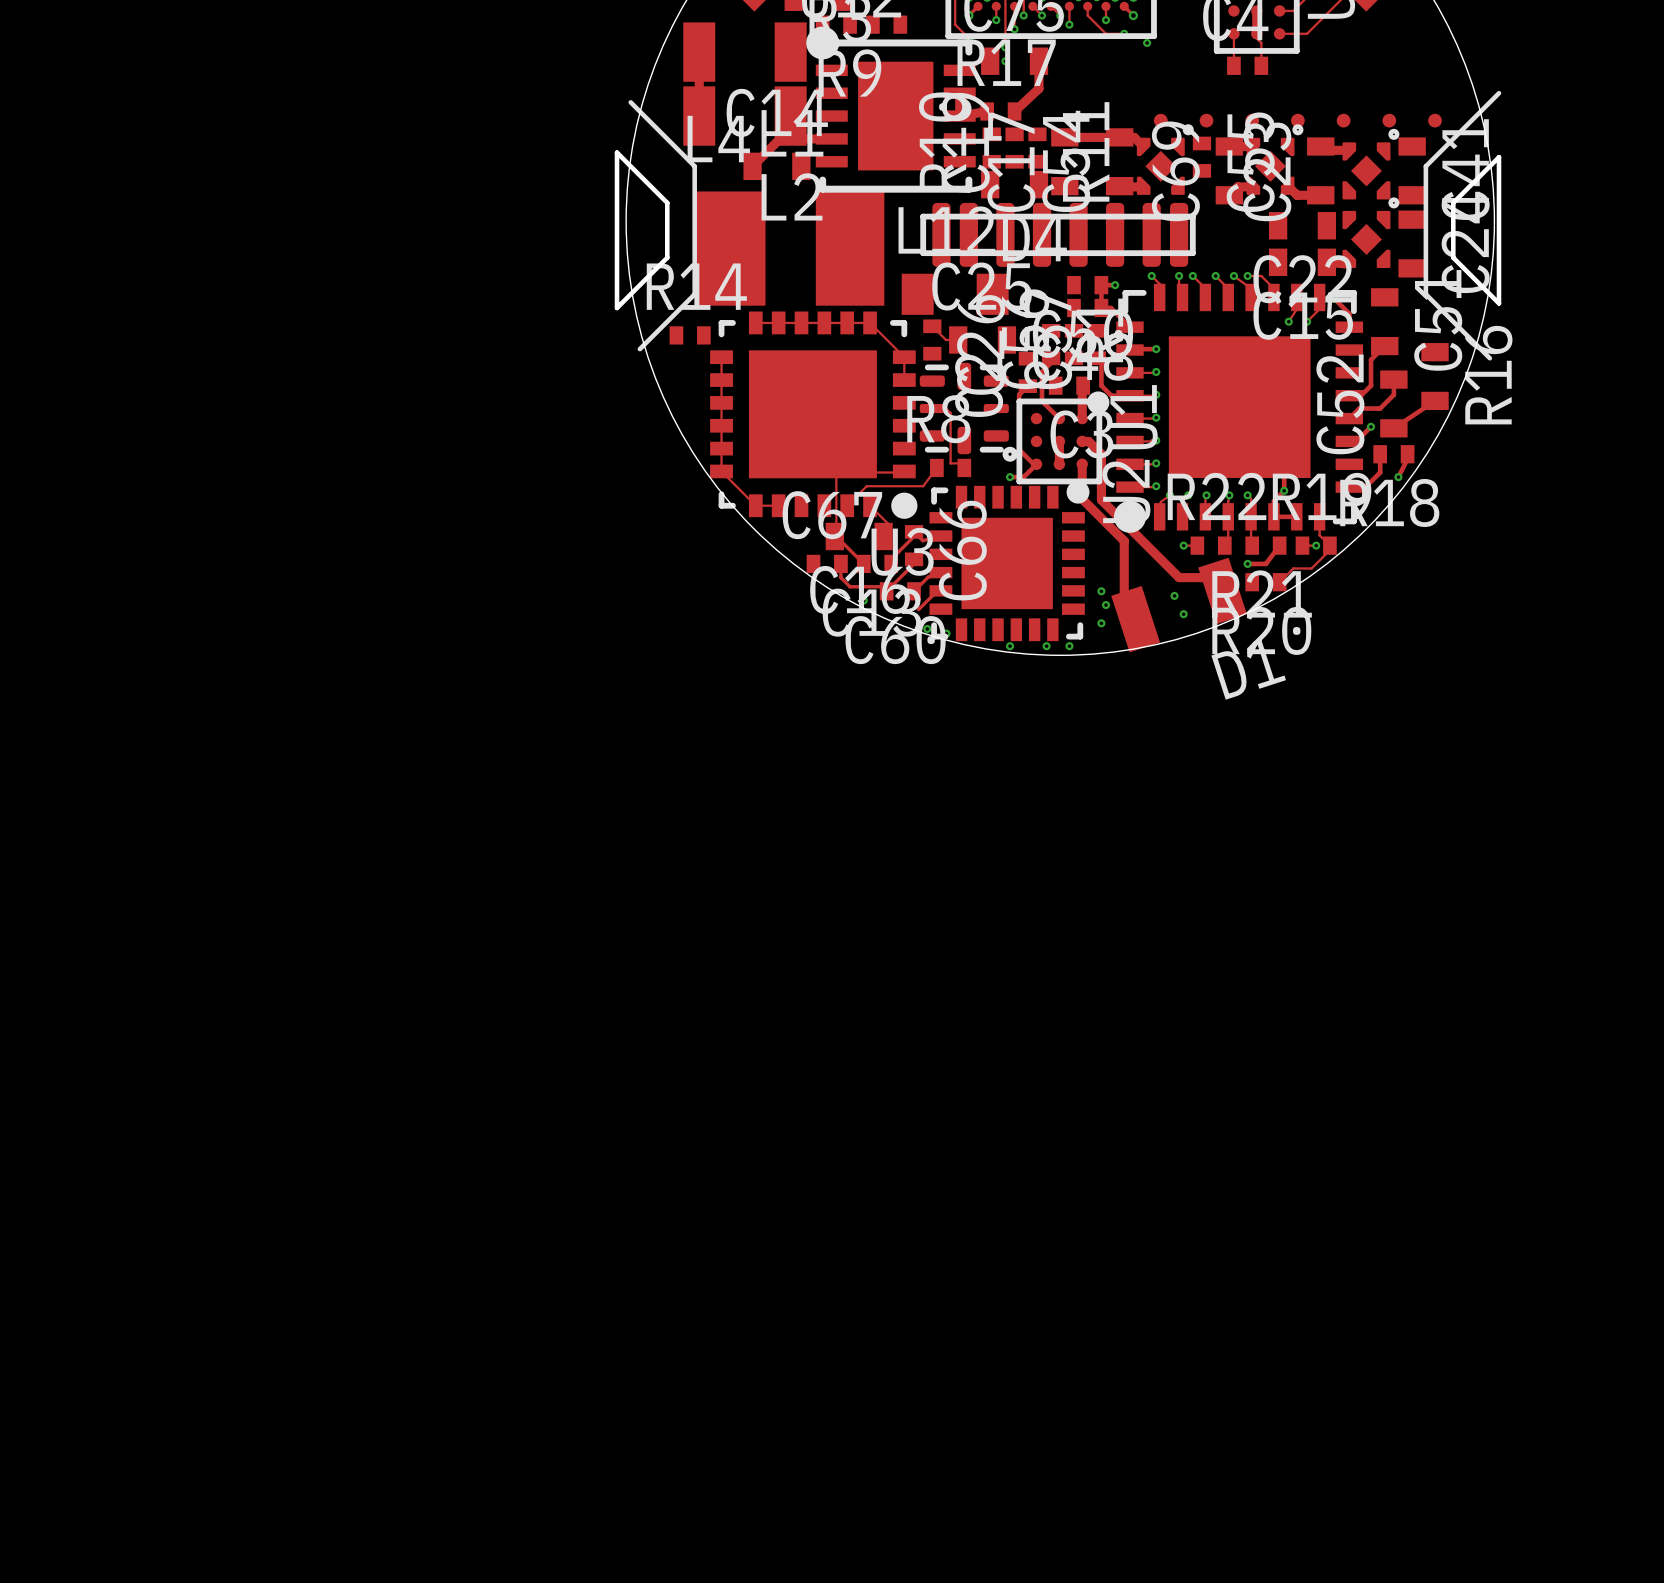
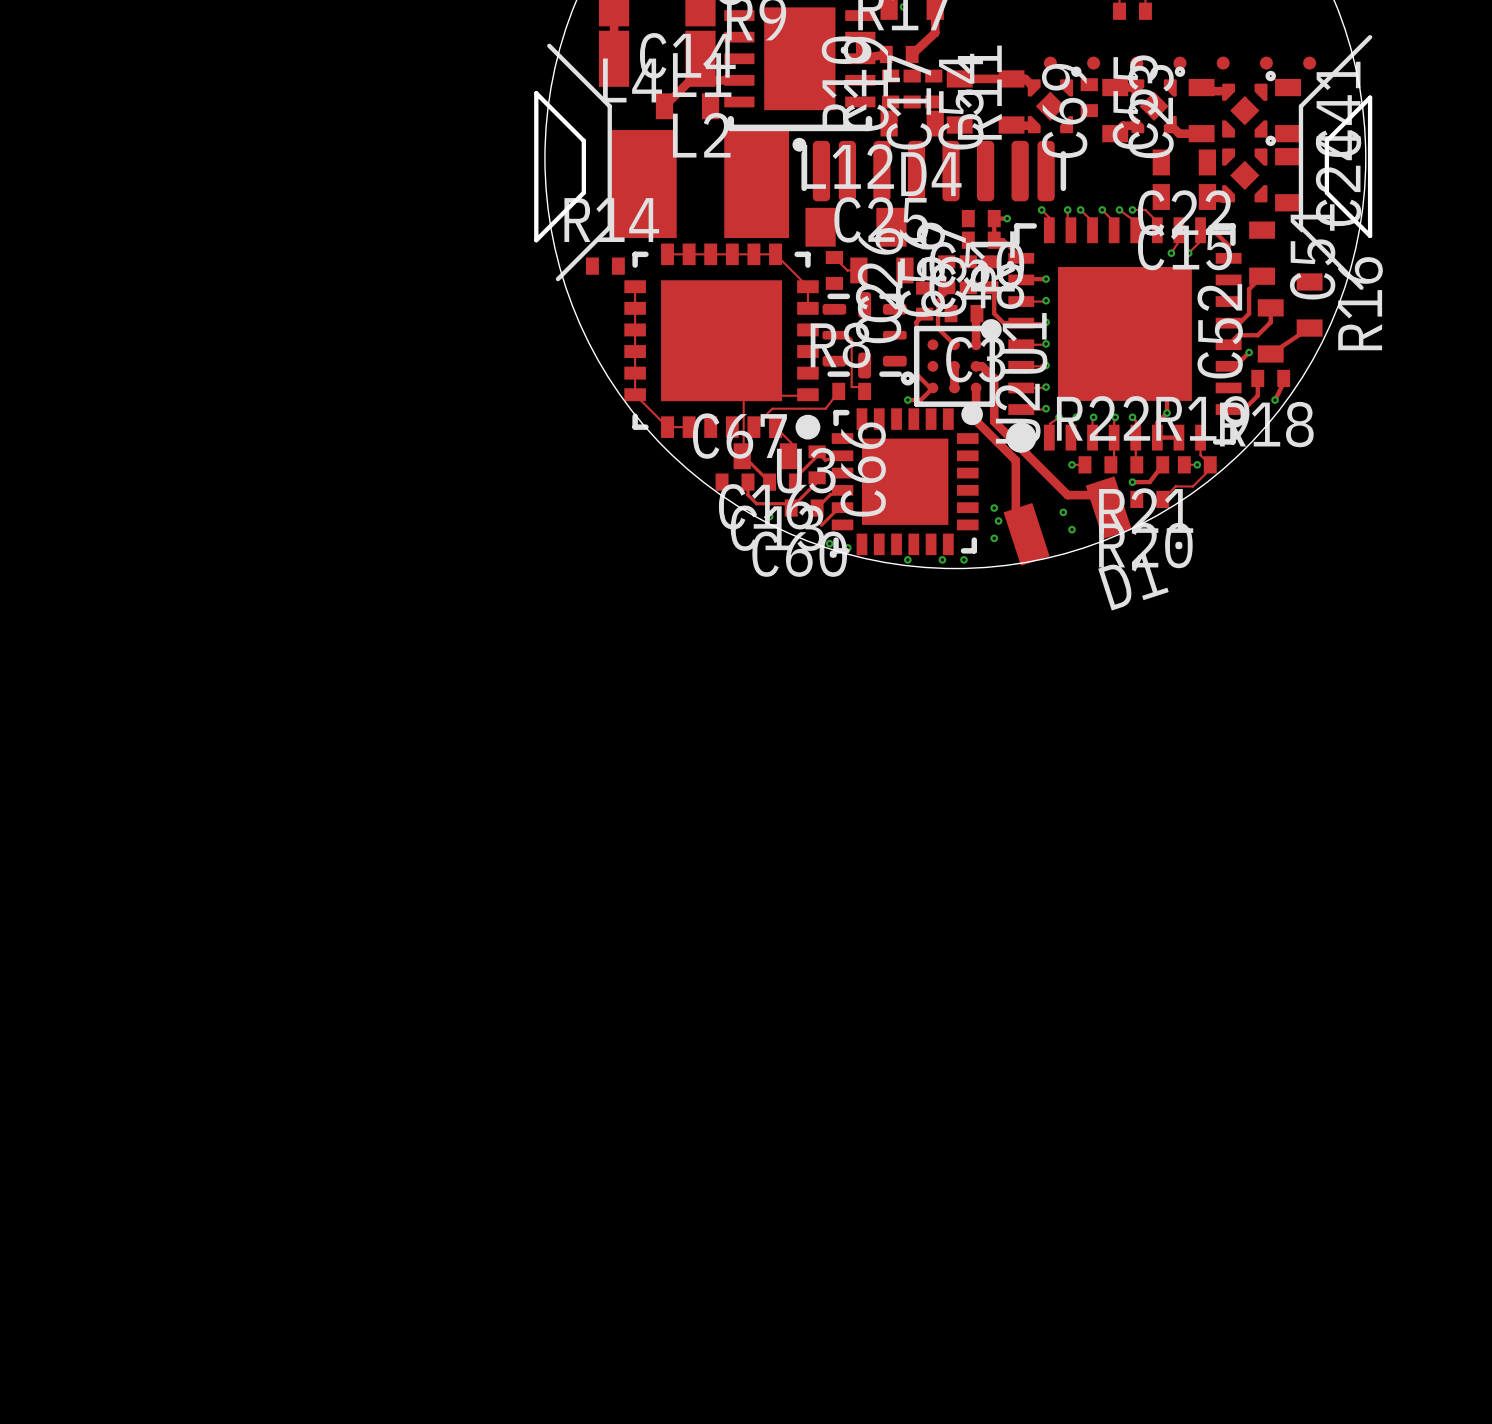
part footprint: [920, 202, 1196, 267] -> [792, 137, 1067, 202]

